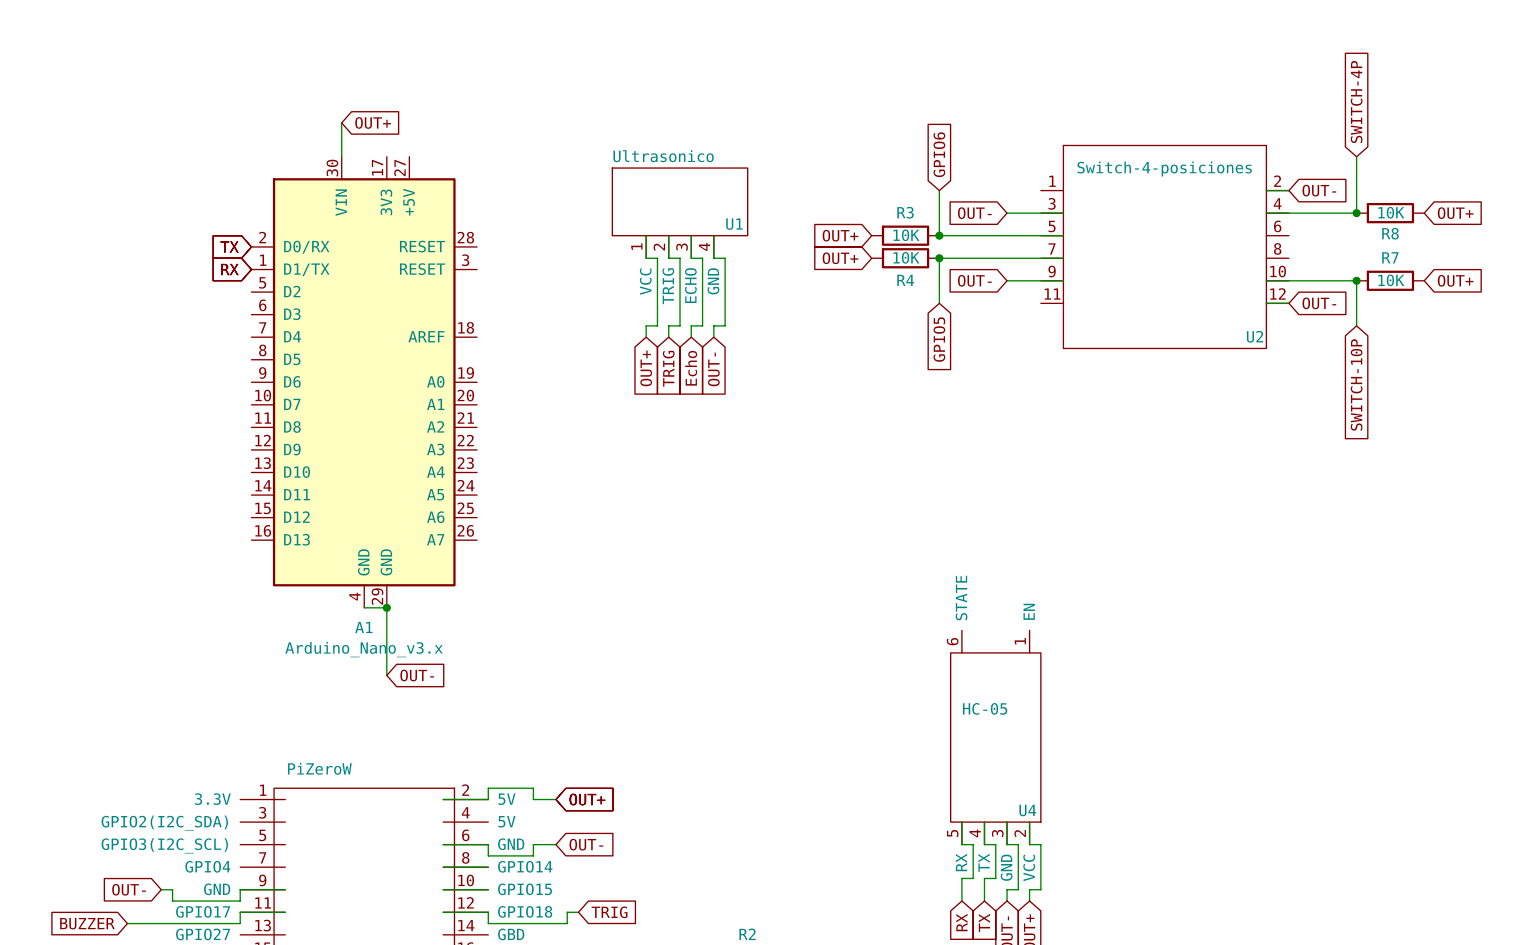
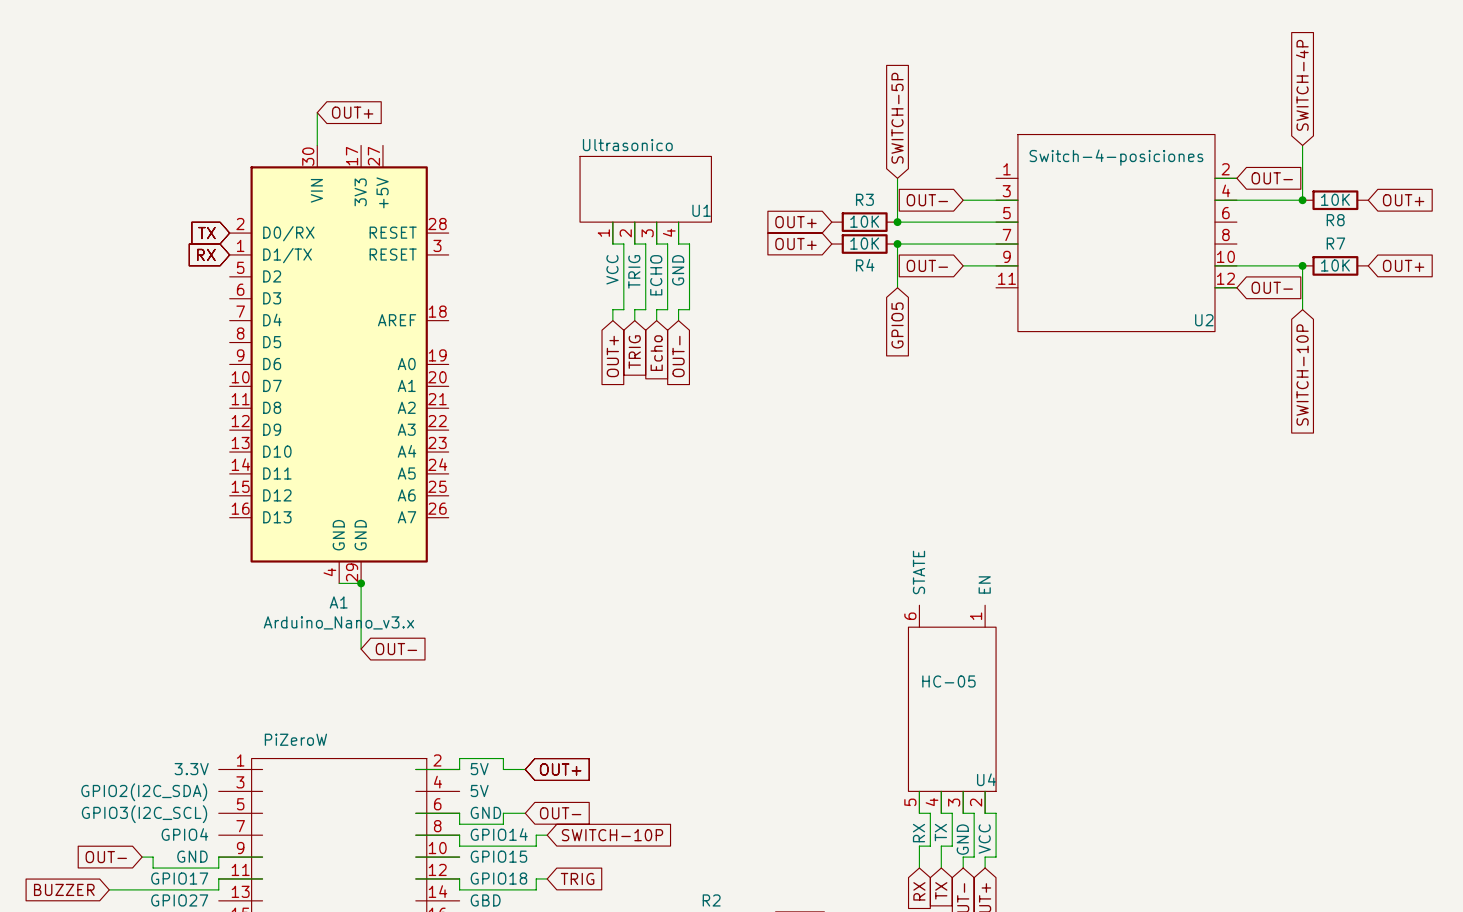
global label: GPIO6 (939, 154) -> SWITCH-5P (897, 118)
wire: none -> (459, 835) (459, 846) (536, 846) (536, 835) (547, 835)
global label: none -> SWITCH-10P (612, 835)

